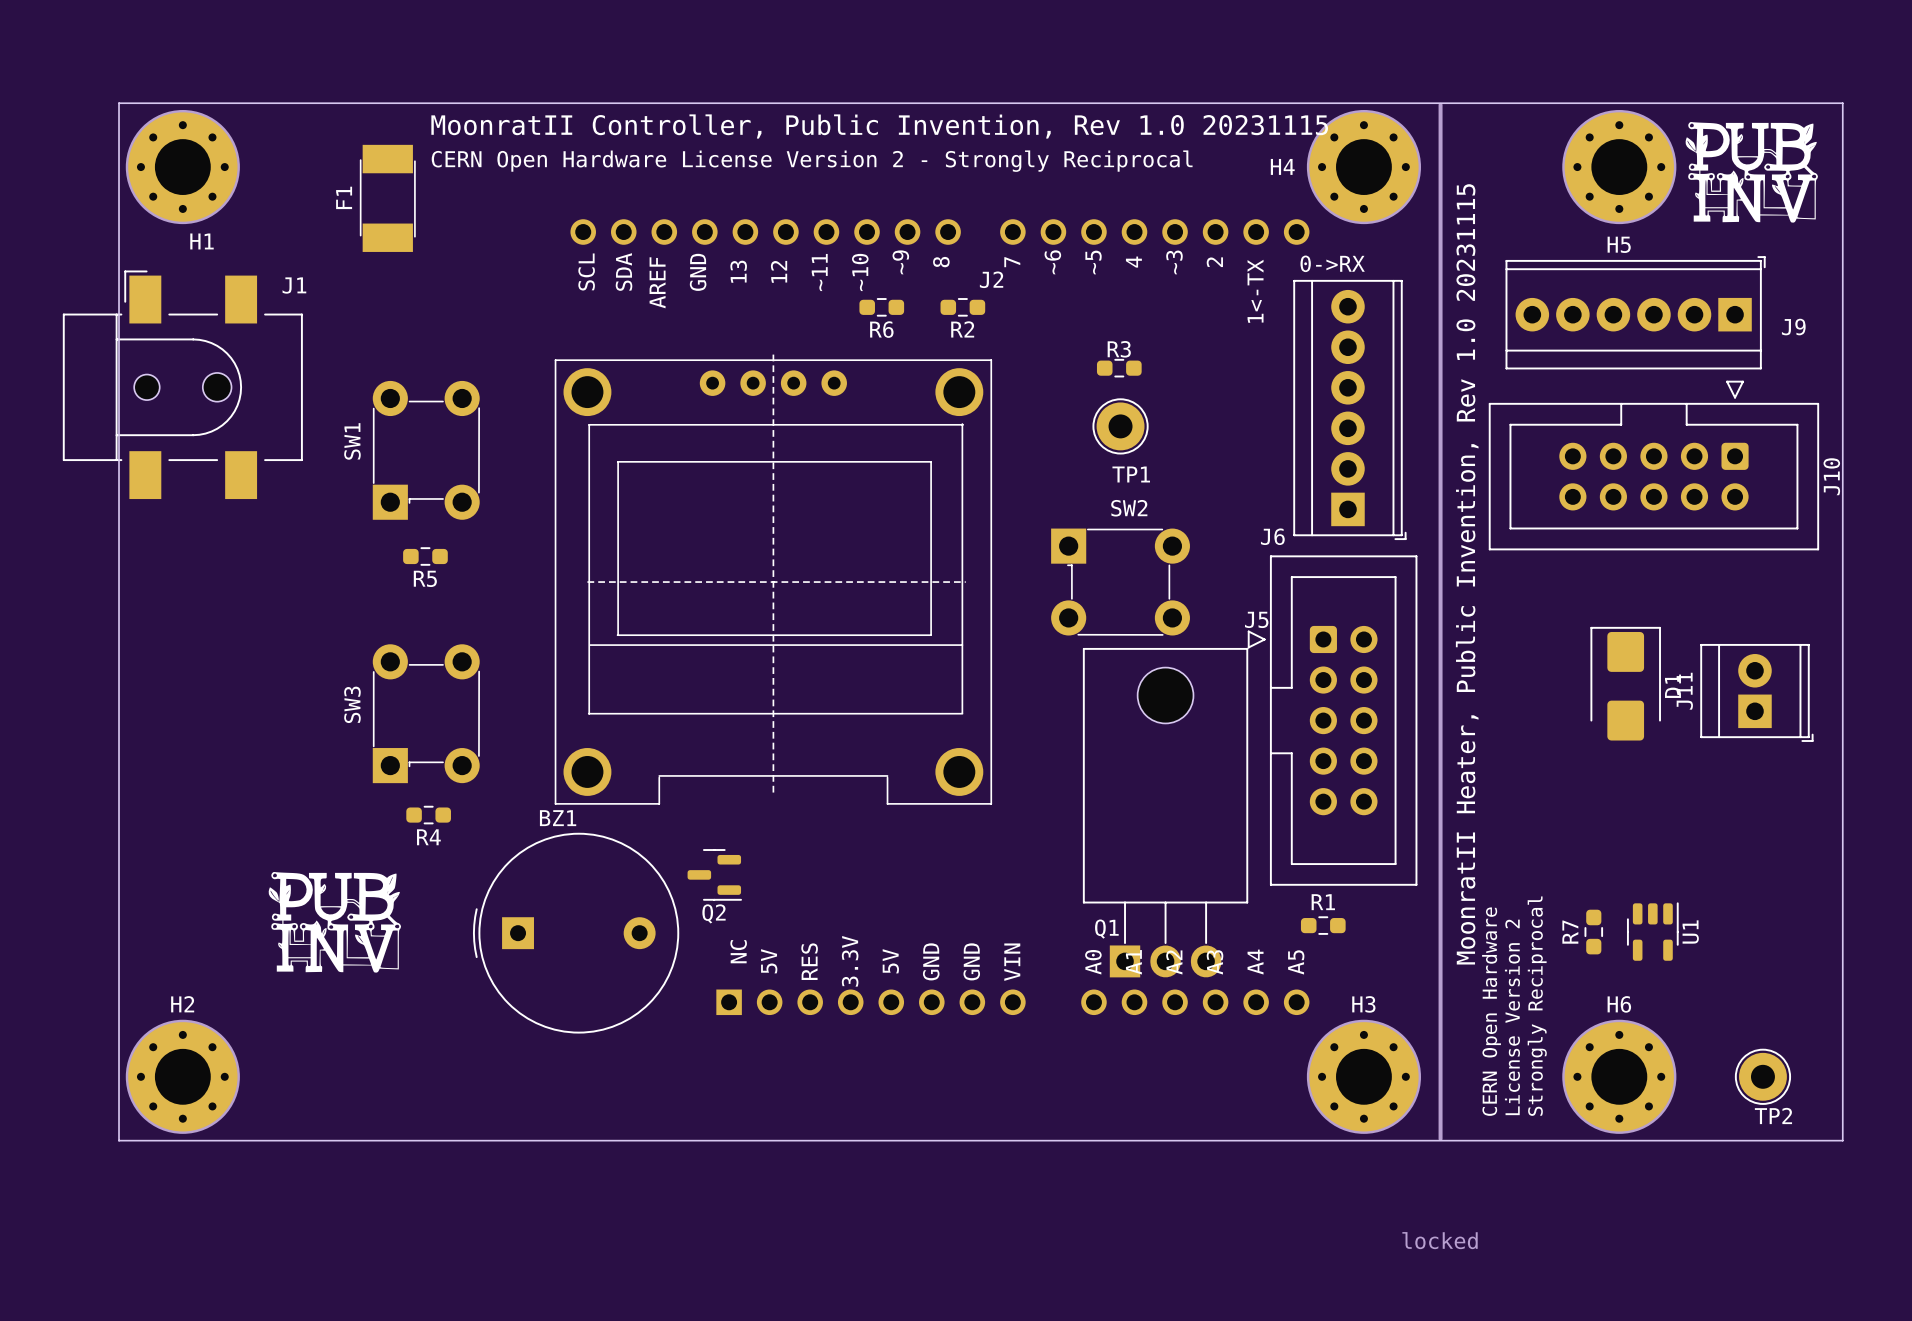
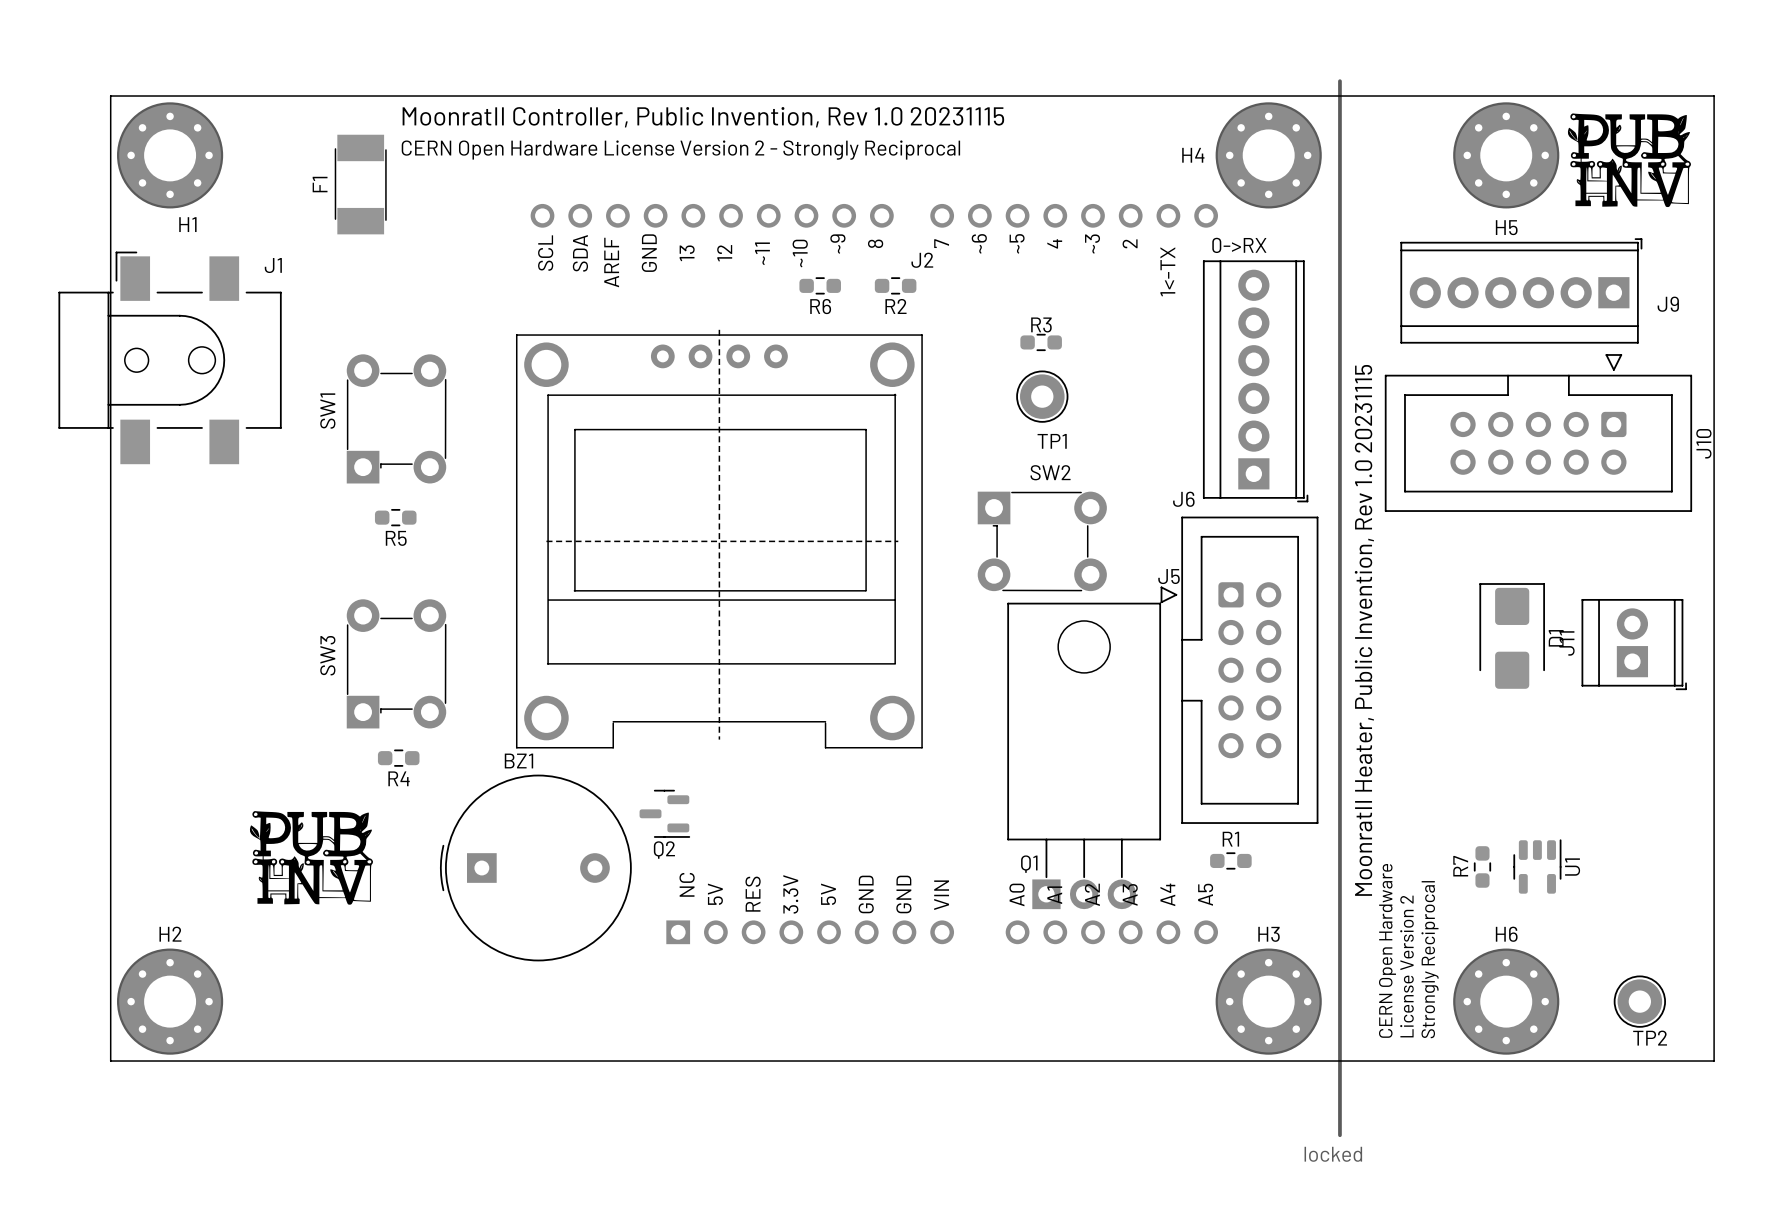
line: none -> (1339, 81) (1339, 97)
line: none -> (1339, 1059) (1339, 1135)

